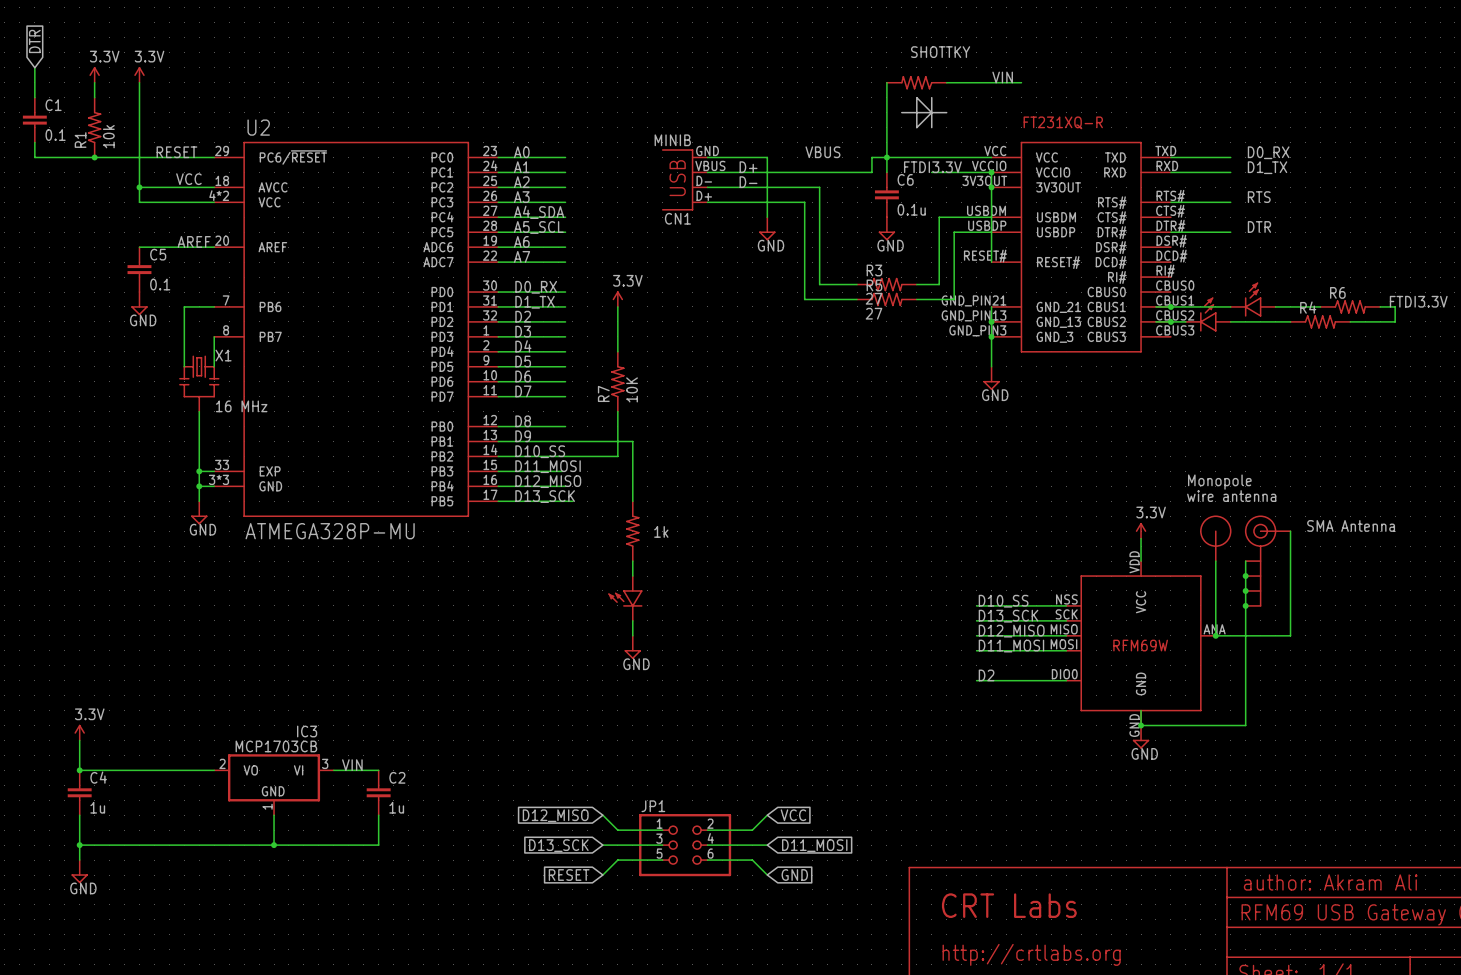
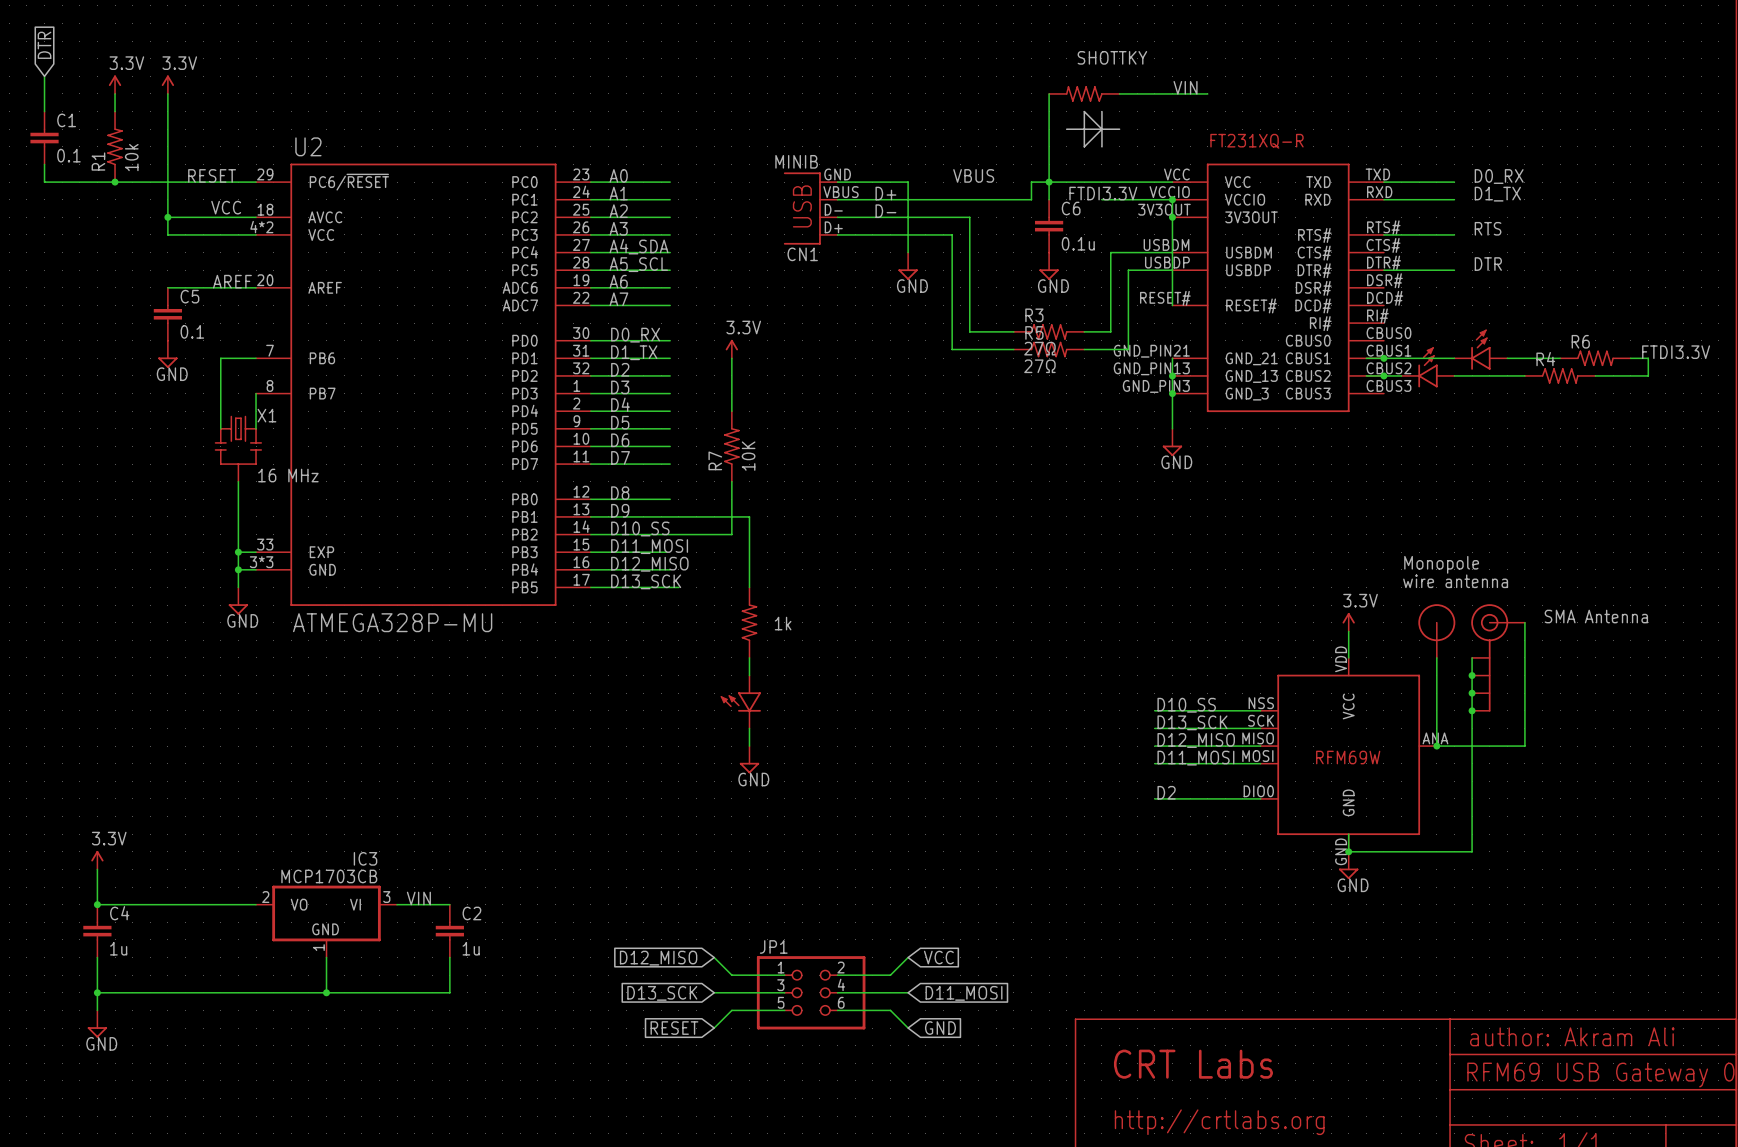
R3 value: 27 (874, 298) -> 27Ω (1039, 348)
R5 value: 27 (874, 313) -> 27Ω (1039, 366)

